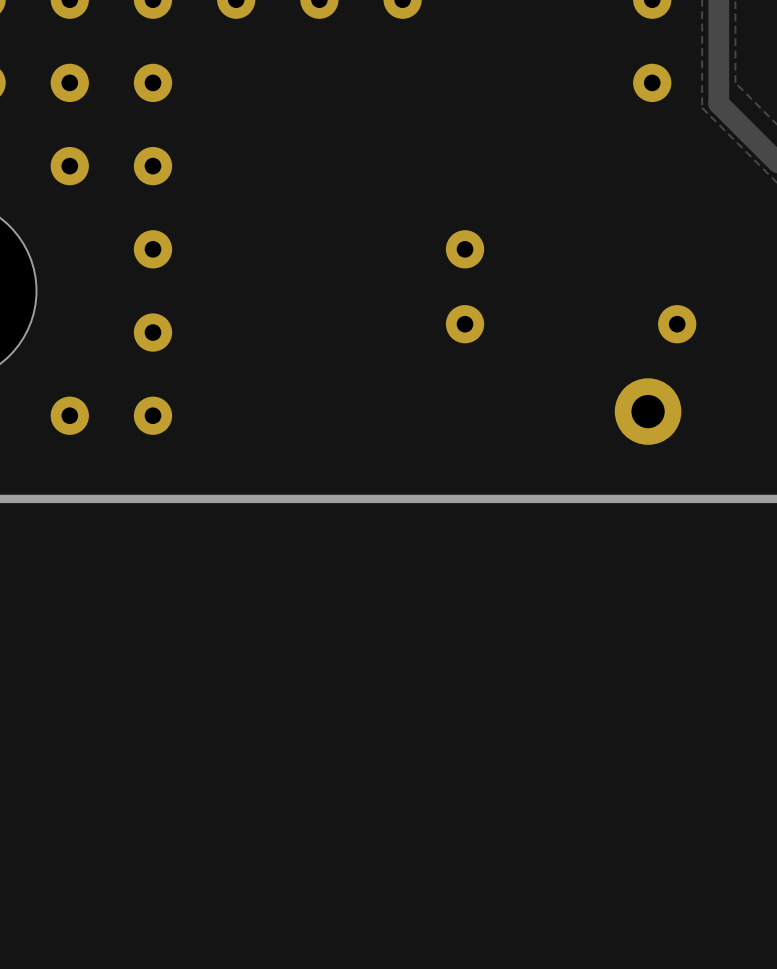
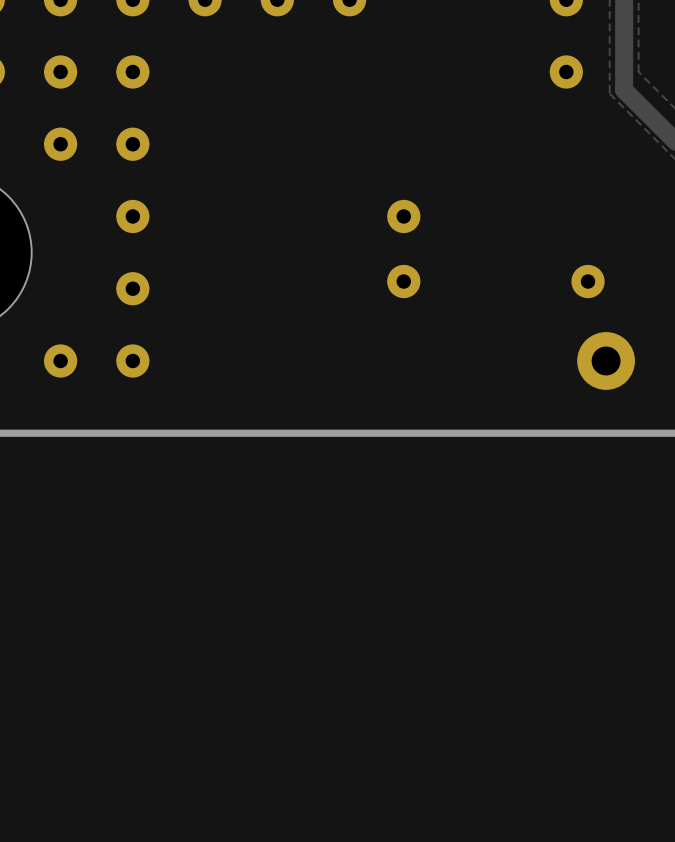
via position: (648, 411) -> (606, 360)

